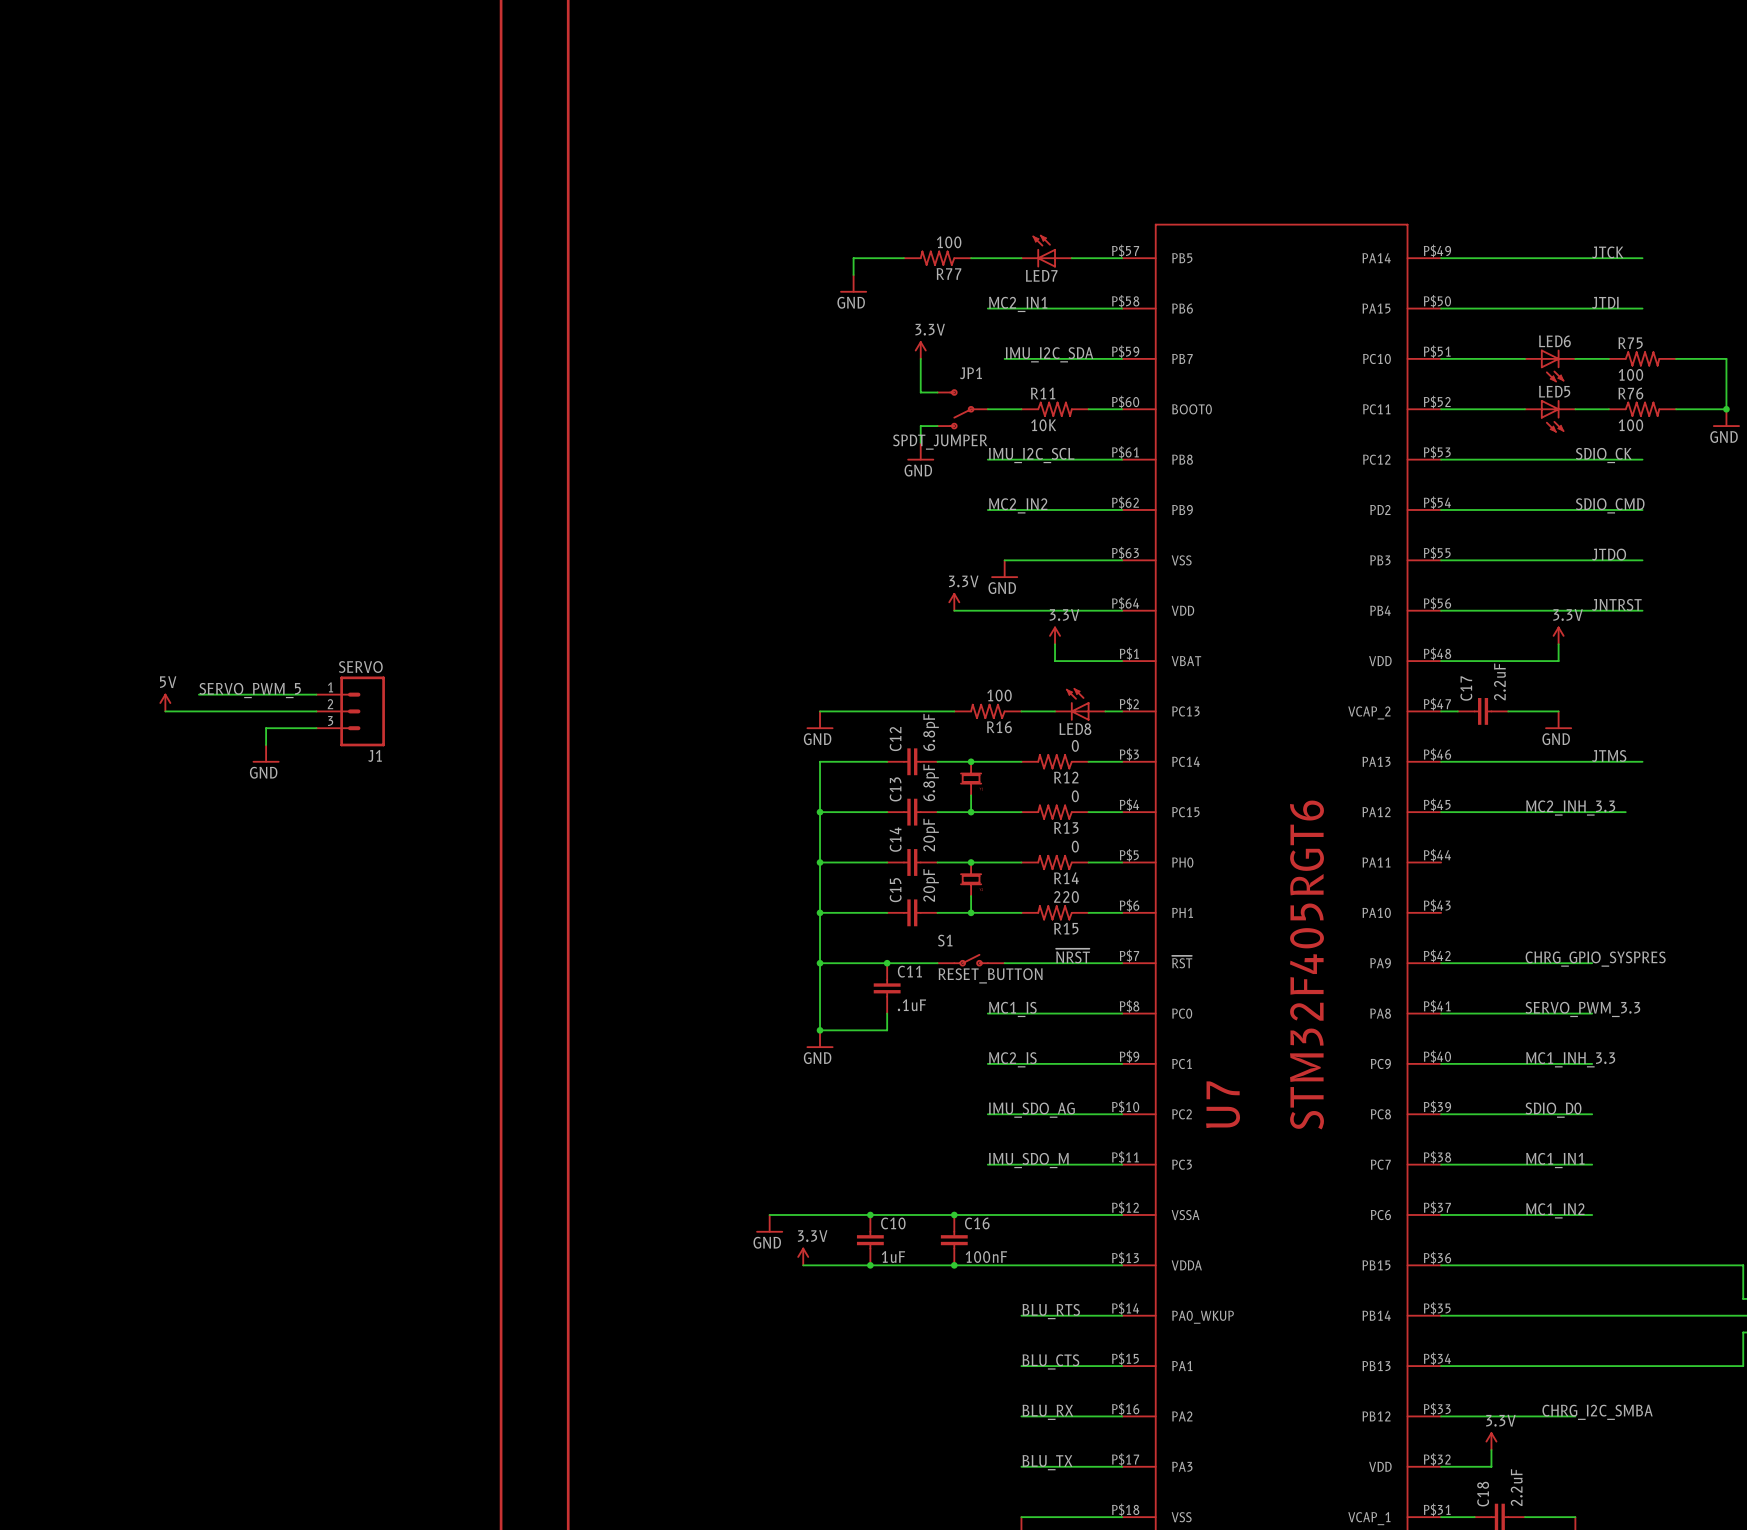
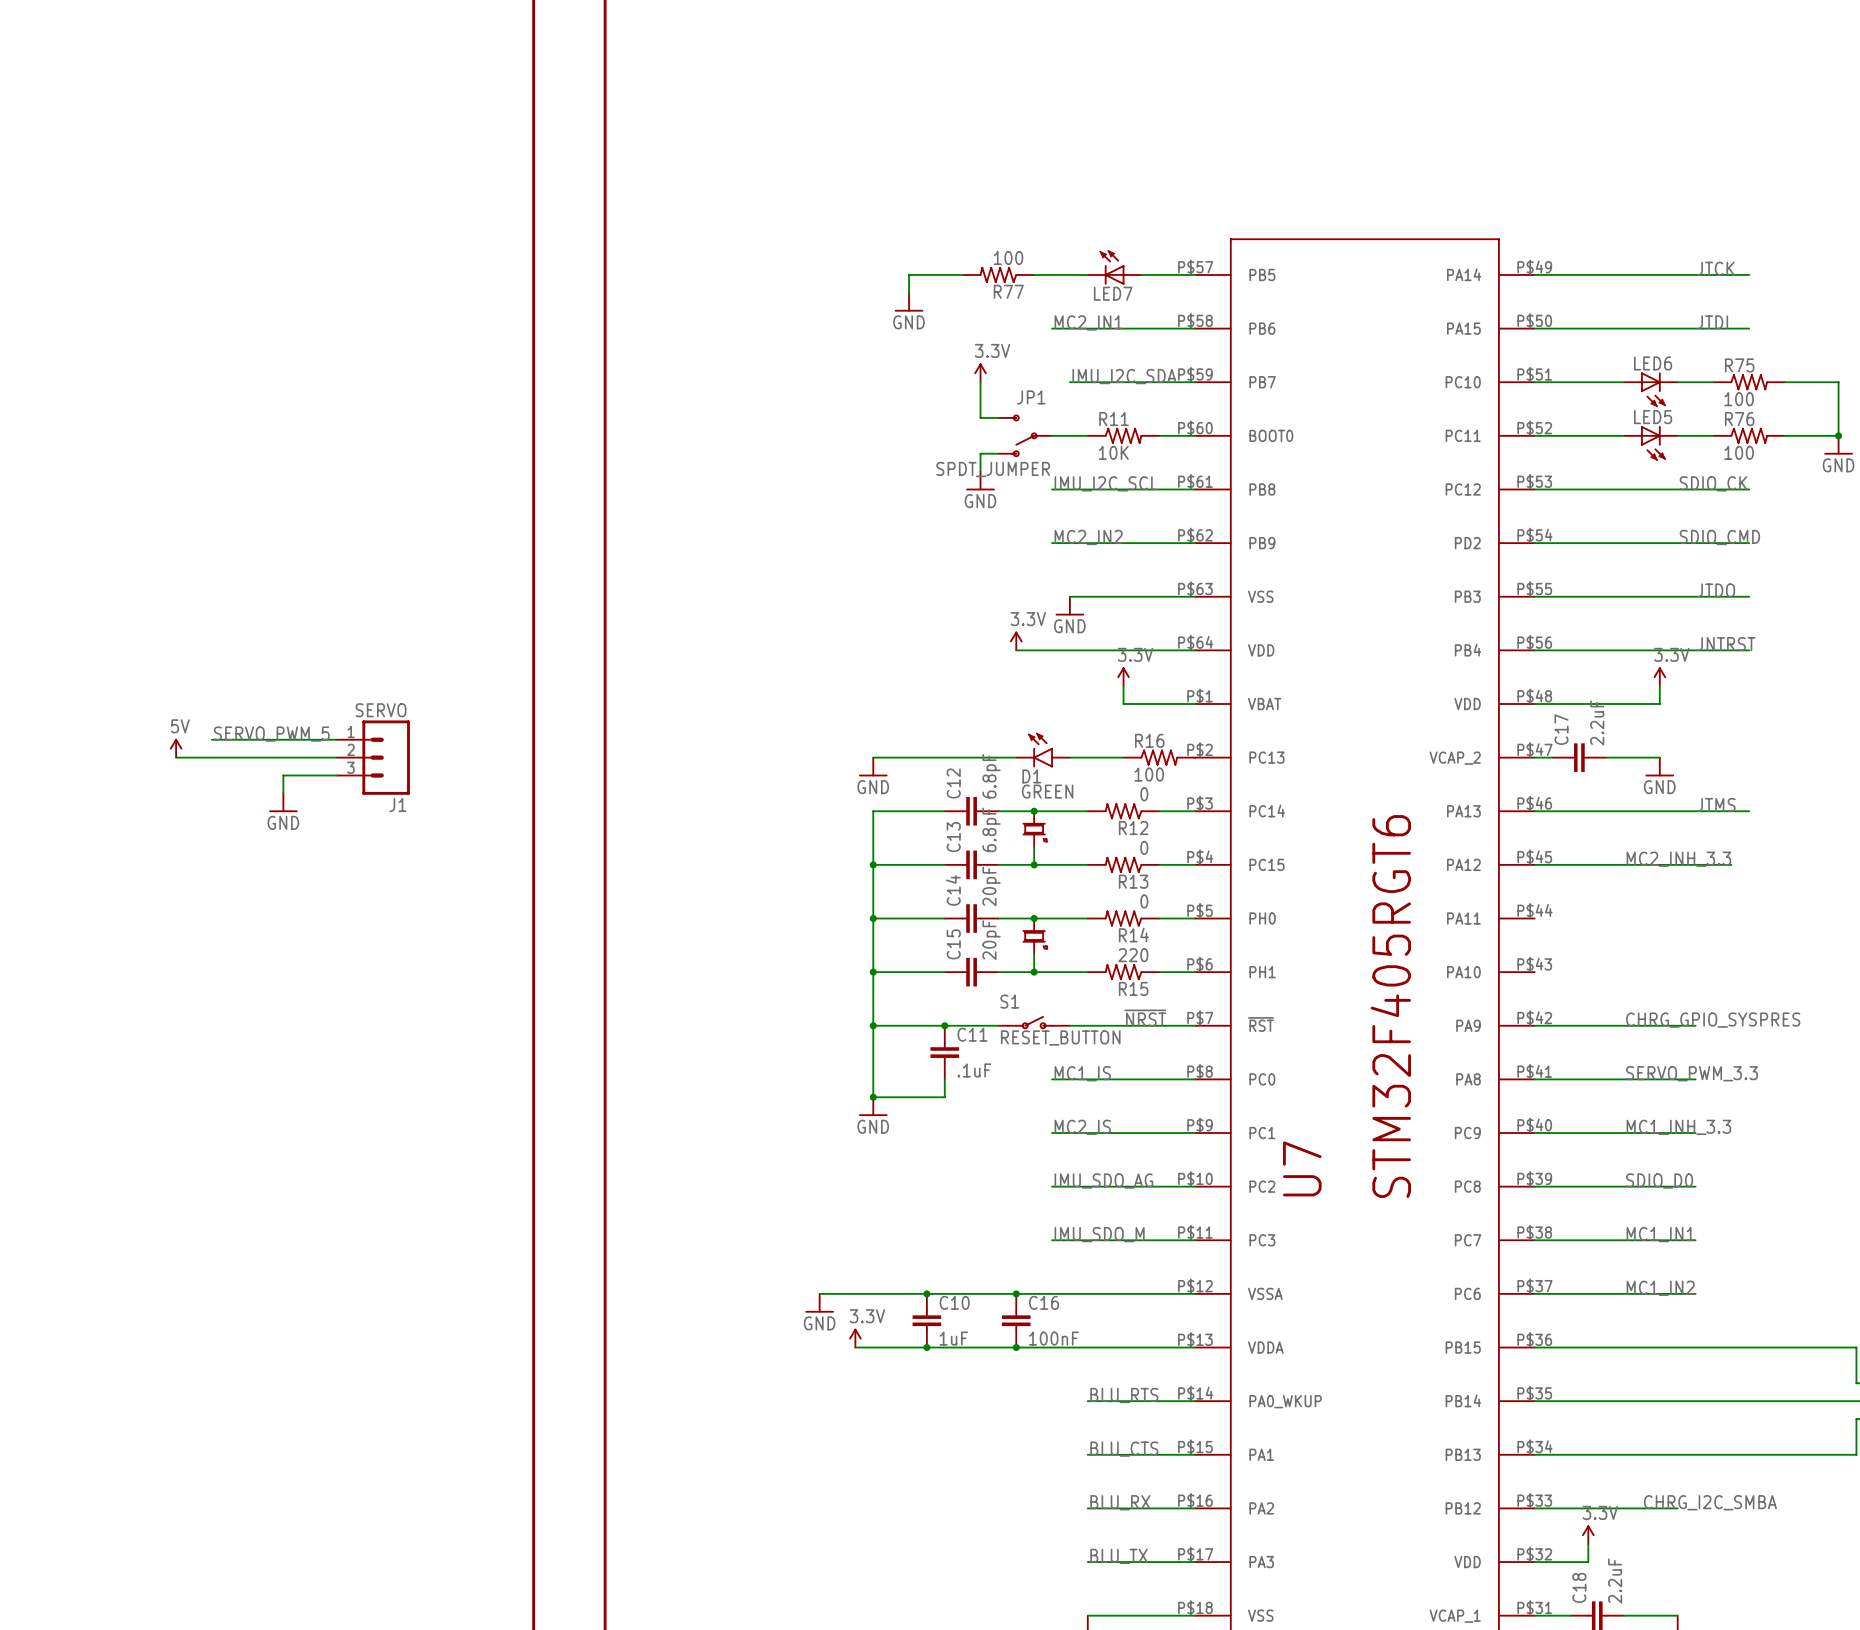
D1: none -> GREEN (1043, 750)
LED8: (1080, 704) -> none
R16 rotation: 0° (987, 711) -> 180° (1159, 757)
R16 position: (987, 711) -> (1159, 757)

